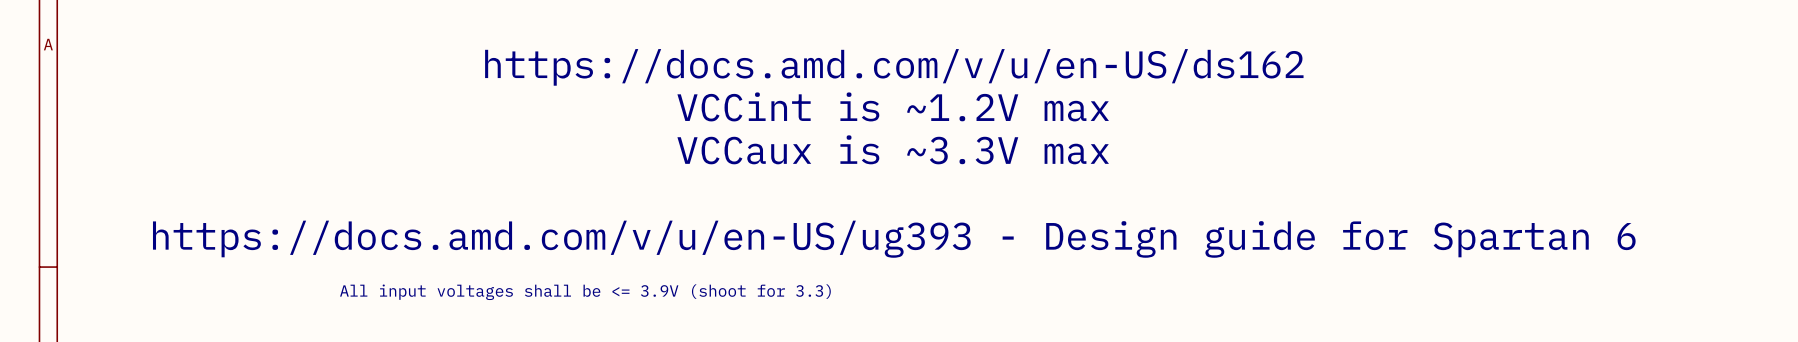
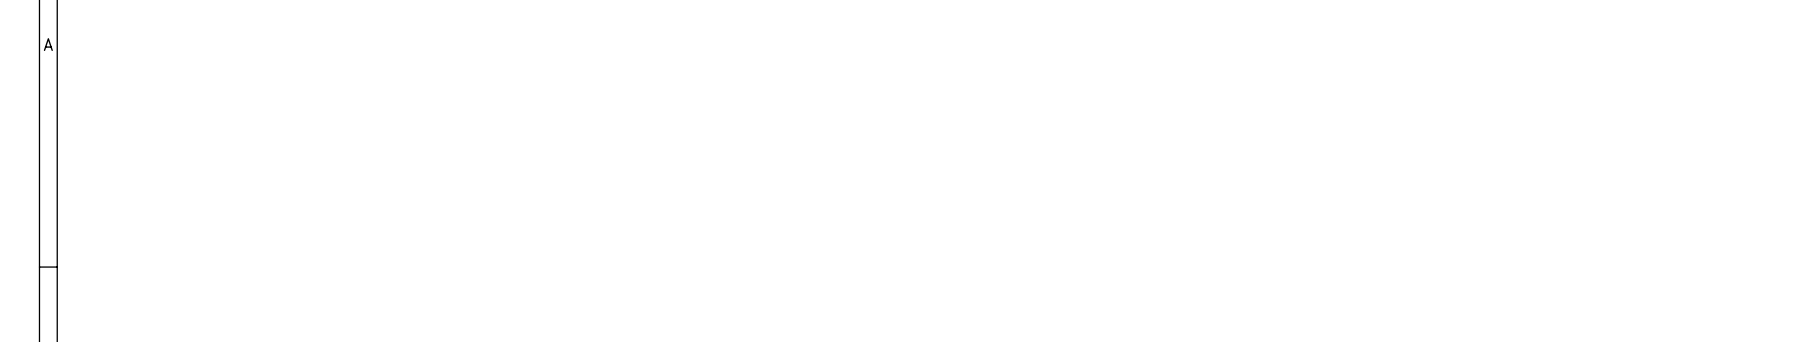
text: https://docs.amd.com/v/u/en-US/ds162 (894, 67) -> none
text: VCCint is ~1.2V max (893, 106) -> none
text: VCCaux is ~3.3V max (893, 149) -> none
text: https://docs.amd.com/v/u/en-US/ug393 - Design guide for Spartan 6 (894, 239) -> none
text: All input voltages shall be <= 3.9V (shoot for 3.3) (585, 292) -> none

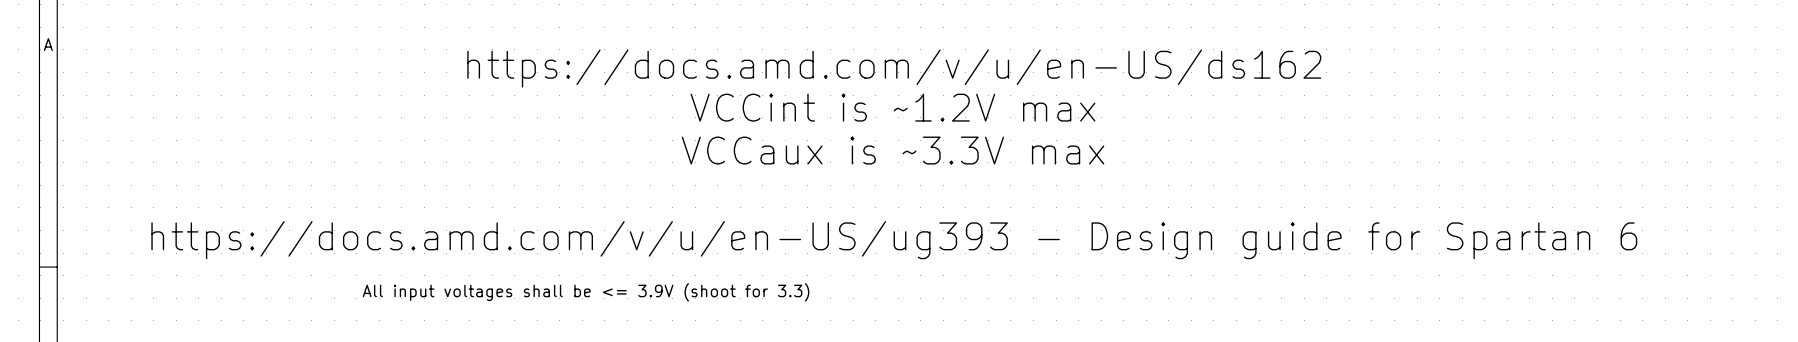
text: none -> https://docs.amd.com/v/u/en-US/ds162 (894, 68)
text: none -> VCCint is ~1.2V max (893, 107)
text: none -> VCCaux is ~3.3V max (893, 150)
text: none -> https://docs.amd.com/v/u/en-US/ug393 - Design guide for Spartan 6 (894, 240)
text: none -> All input voltages shall be <= 3.9V (shoot for 3.3) (586, 292)

